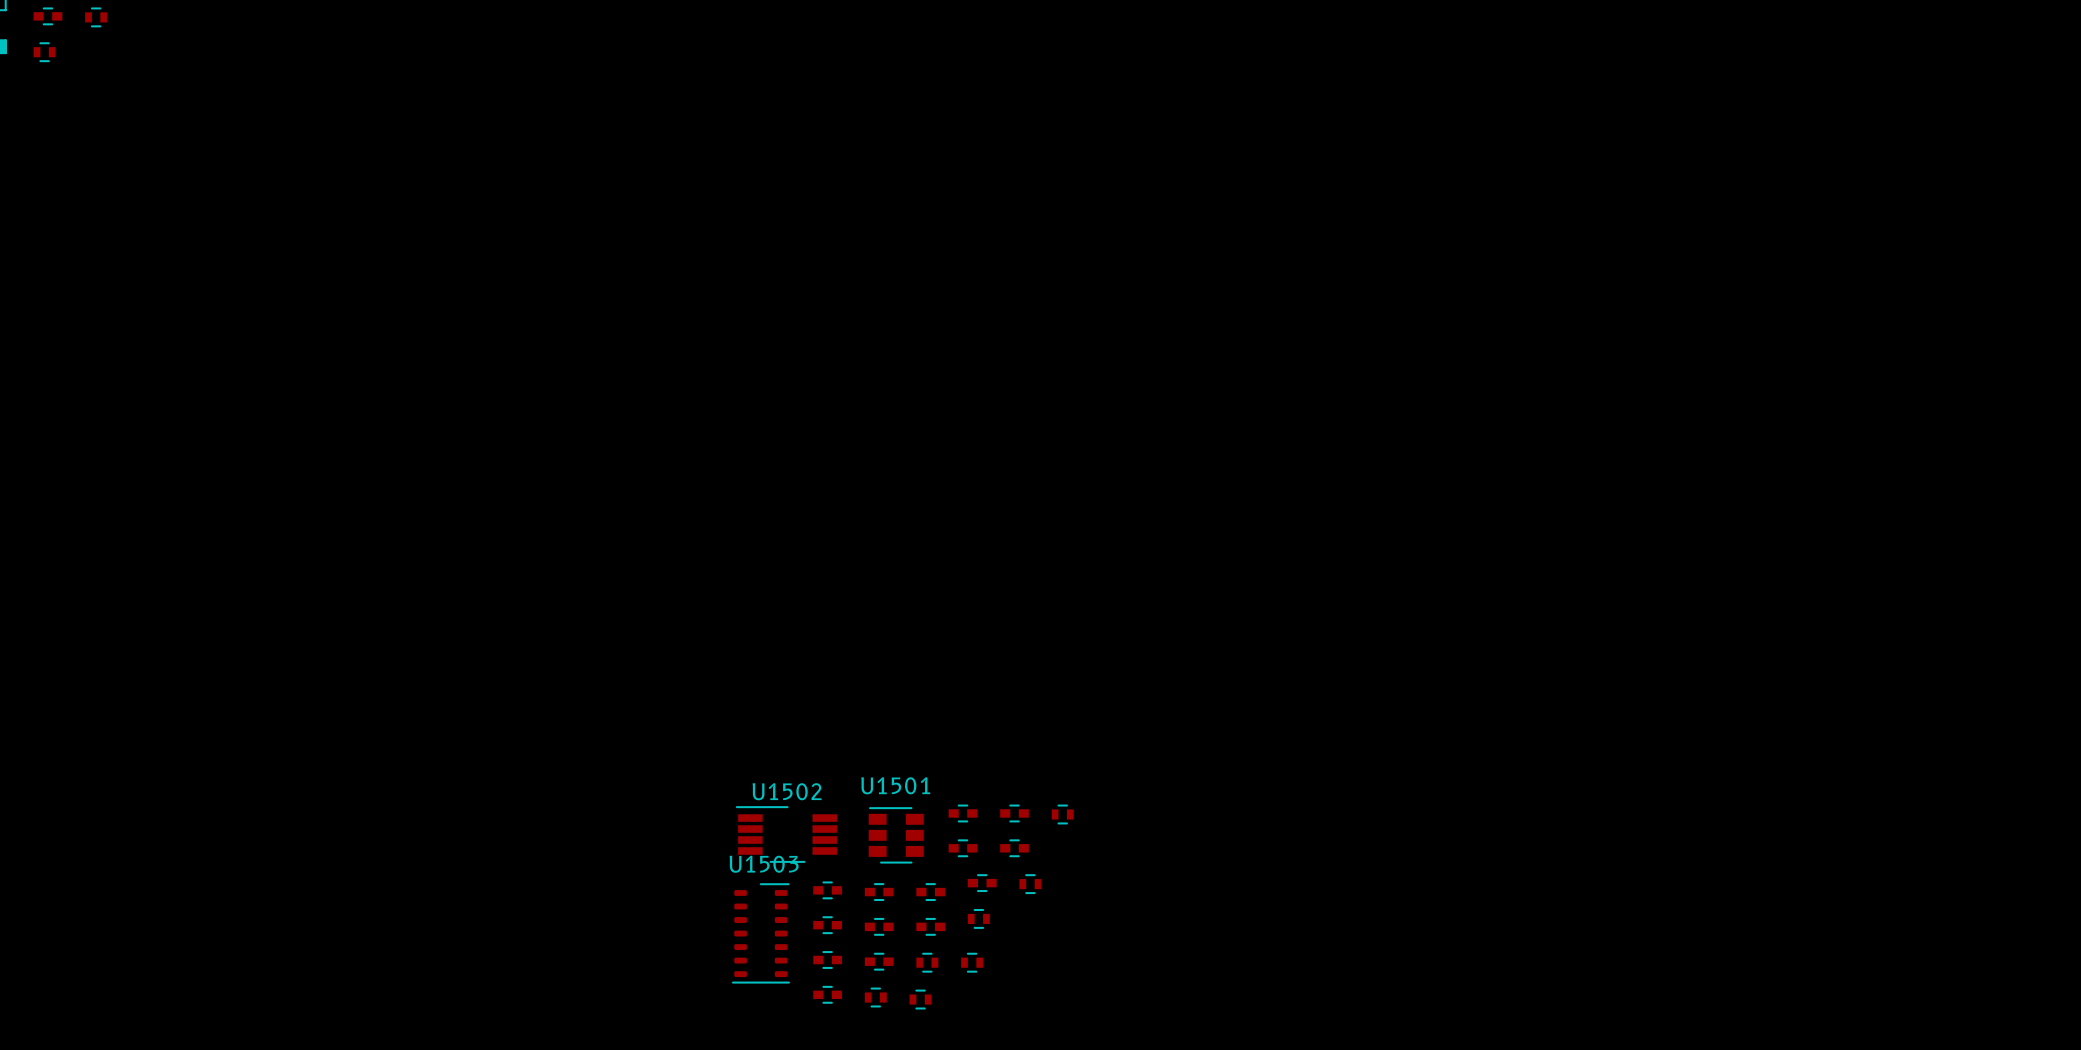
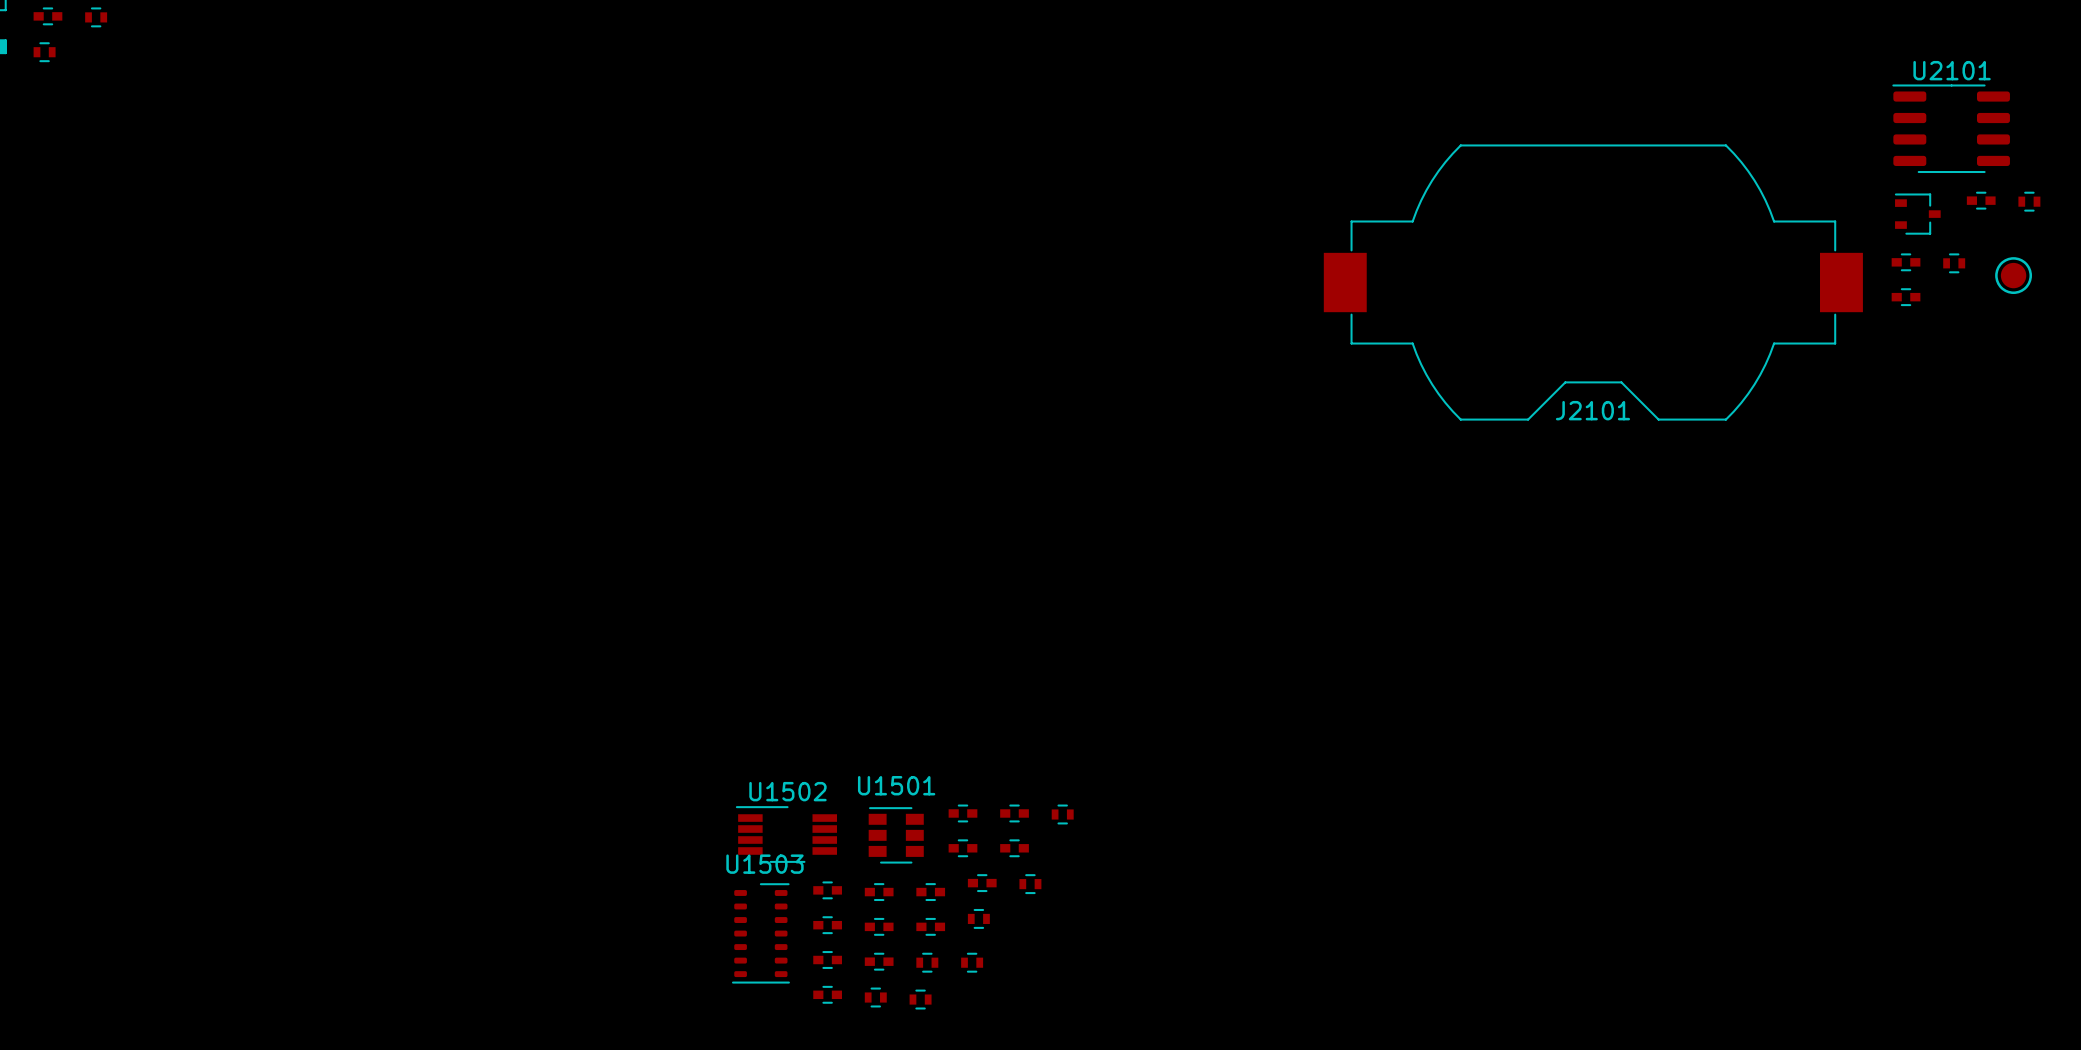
U2101: none -> (1951, 128)
part: none -> (1981, 200)
part: none -> (2029, 201)
part: none -> (1917, 214)
part: none -> (1906, 262)
part: none -> (1954, 263)
part: none -> (2013, 275)
J2101: none -> (1593, 282)
part: none -> (1906, 297)

